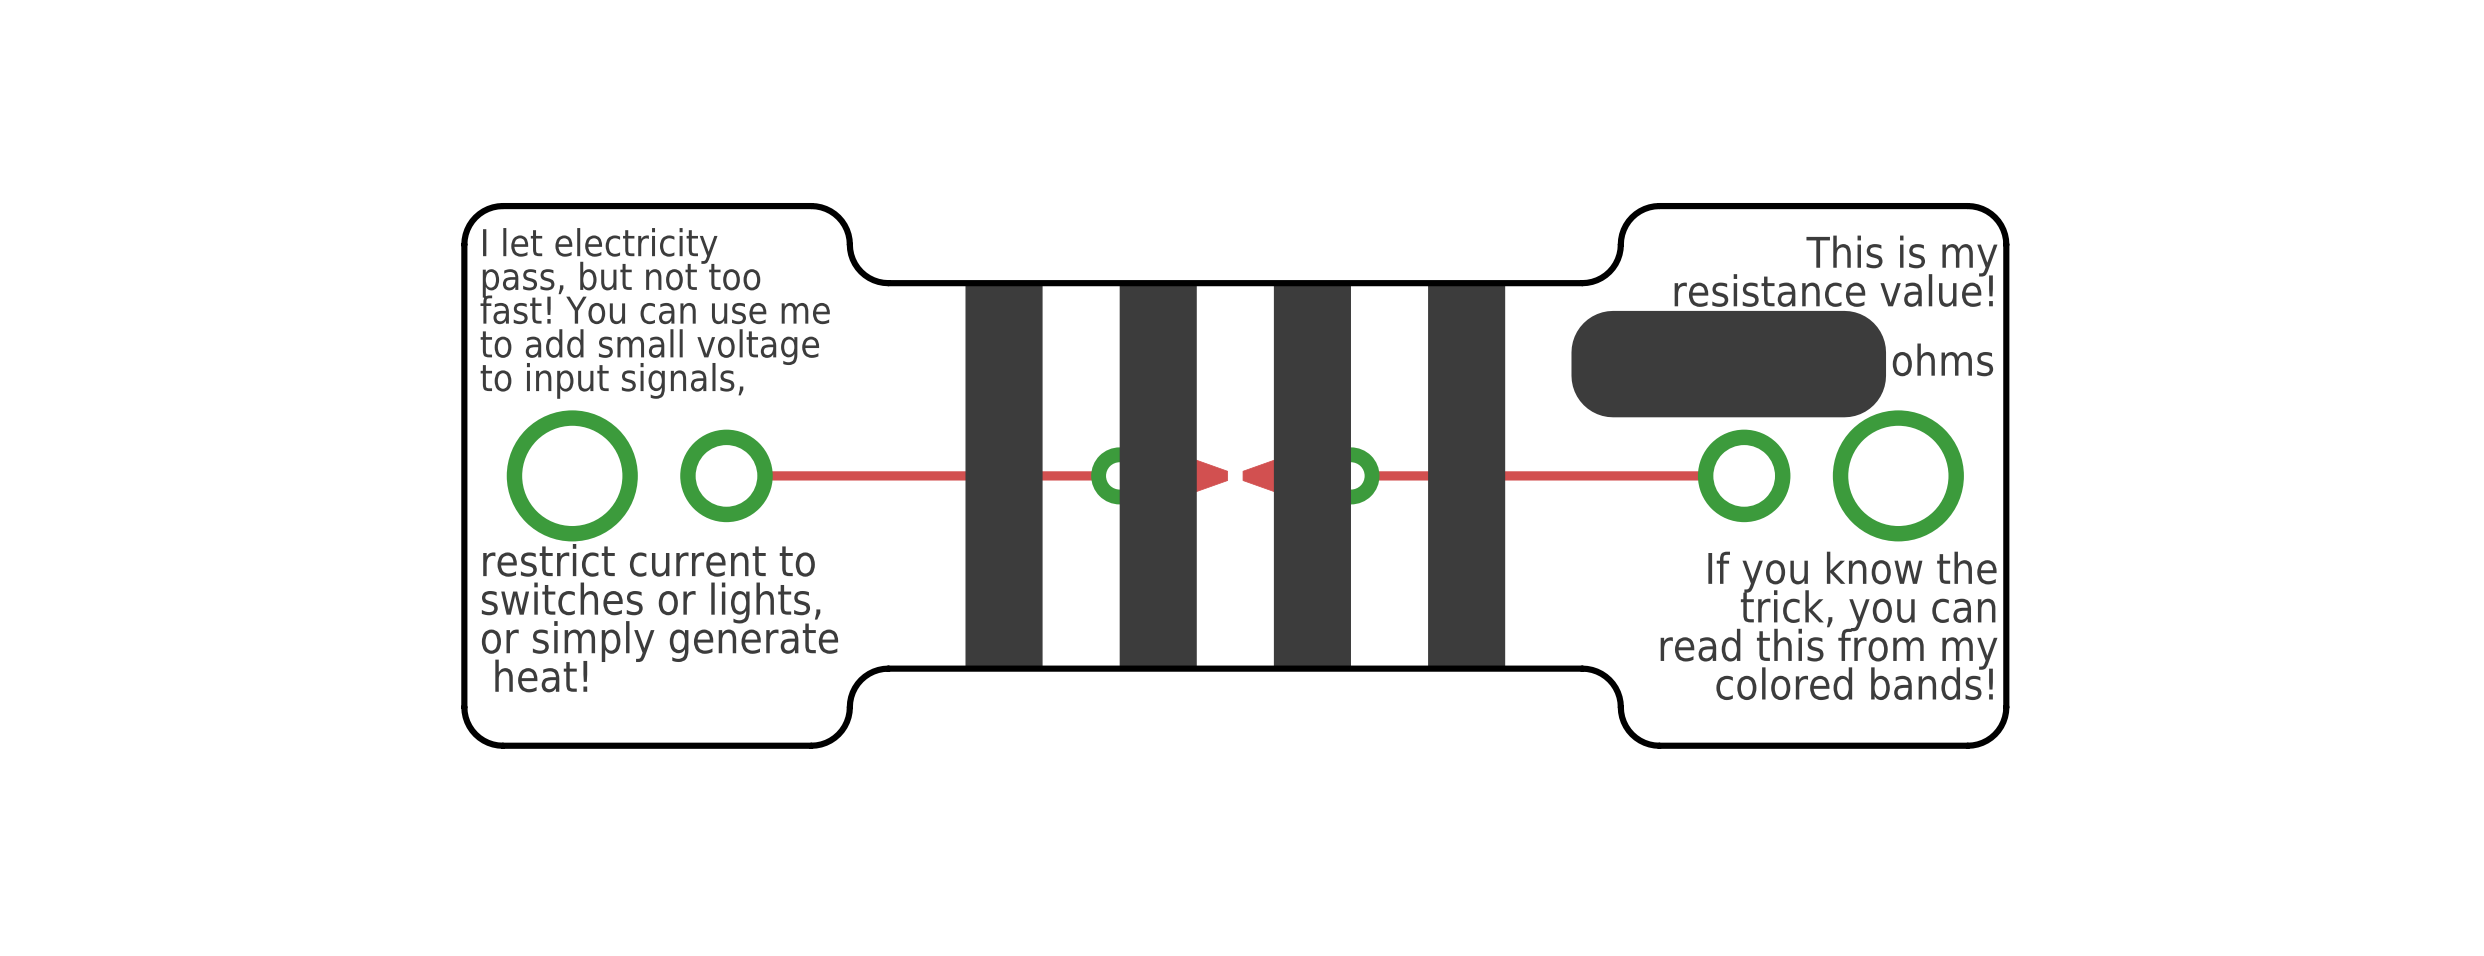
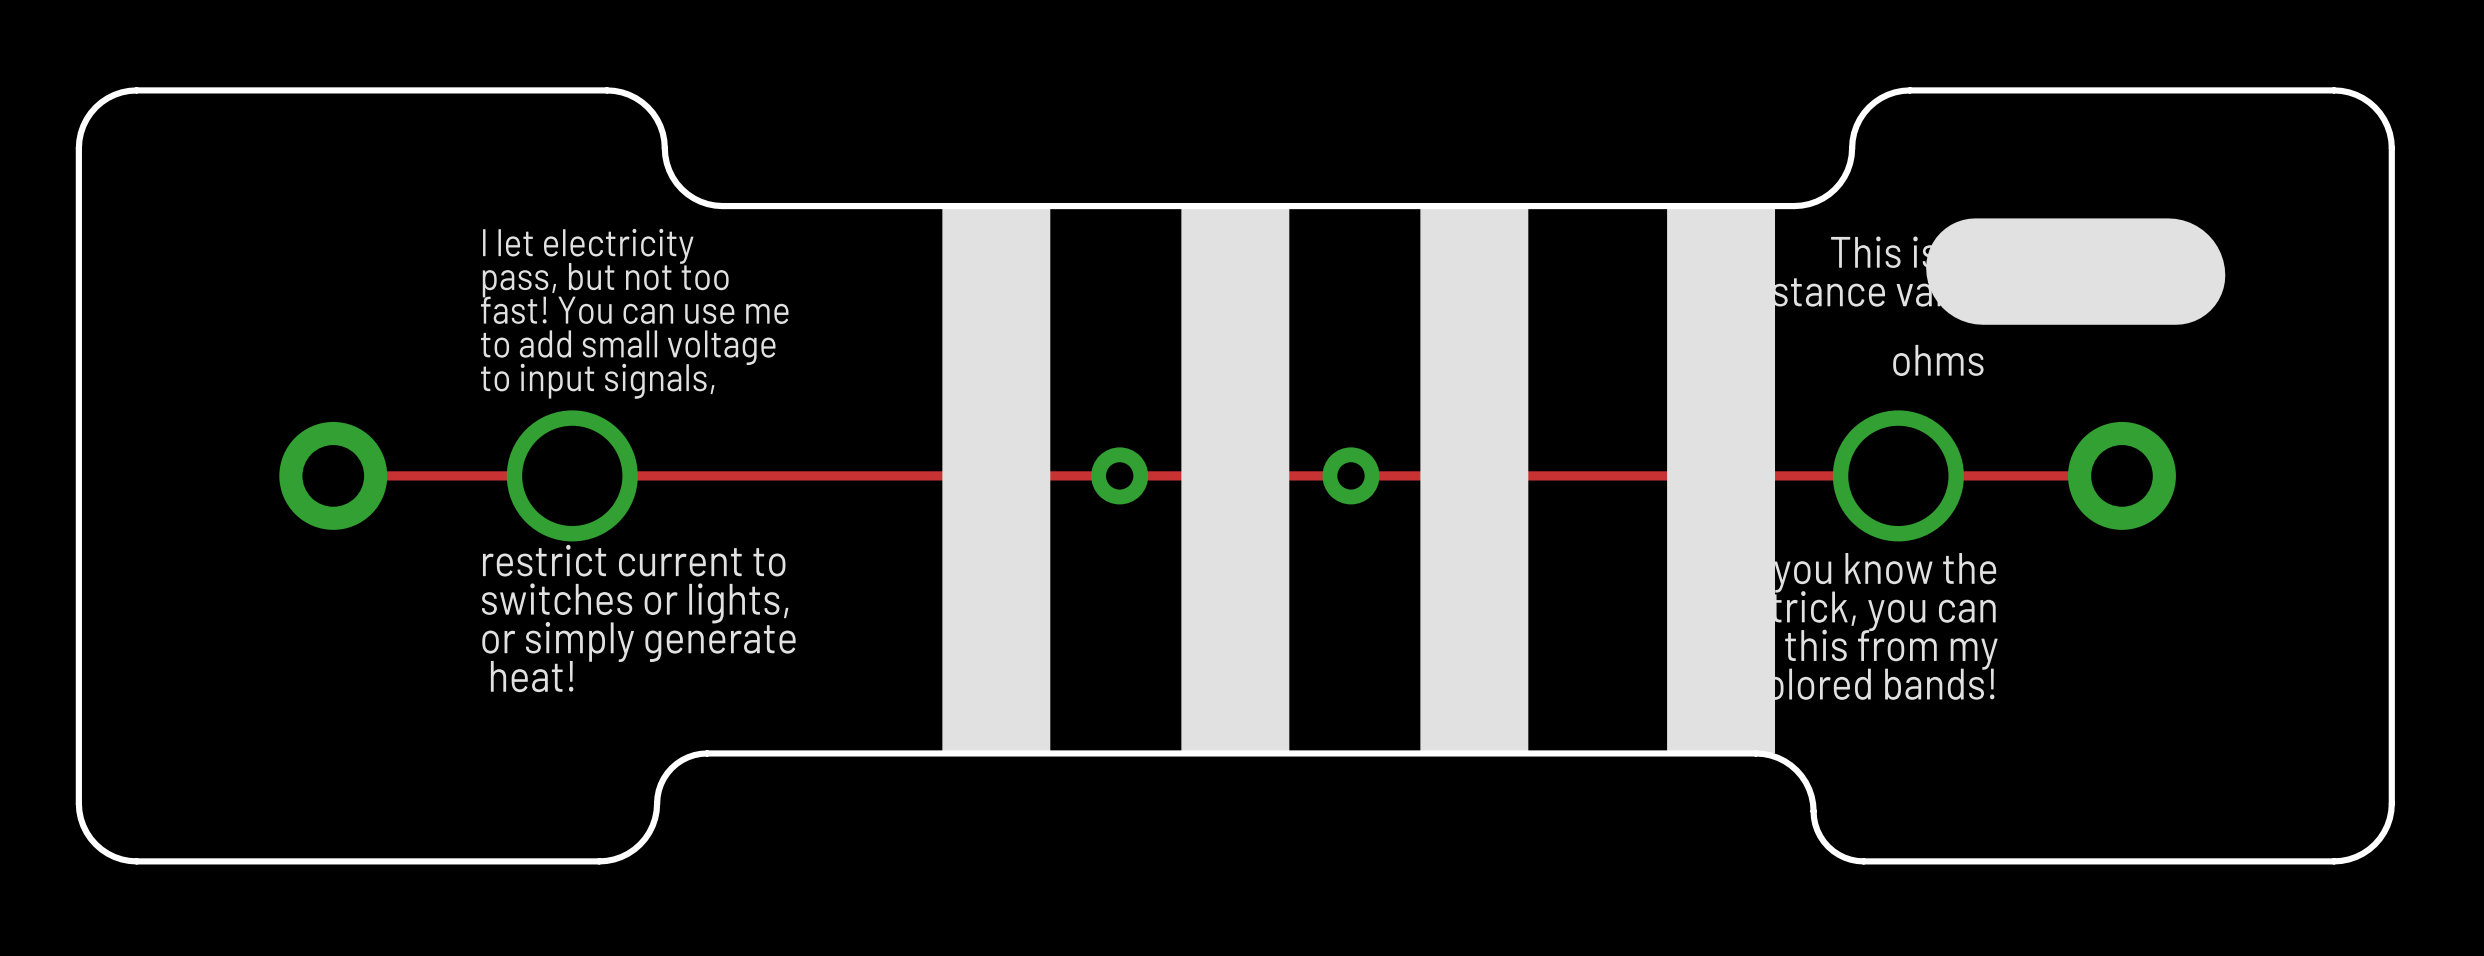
drawing: none -> [1181, 206, 1290, 754]
board edge: (1659, 206) (1640, 211) (1628, 221) (1622, 234) (1617, 259) (1609, 271) (1597, 280) (1582, 283) (883, 282) (869, 277) (857, 268) (851, 254) (846, 229) (838, 217) (826, 208) (811, 206) -> (1659, 206) (811, 206)
drawing: none -> [1667, 206, 1776, 754]
board edge: (1794, 206) (1972, 206) (1991, 214) (2003, 229) (2006, 244) (2006, 707) (2001, 726) (1991, 737) (1982, 742) (1967, 745) (1654, 745) (1640, 740) (1628, 730) (1622, 717) (1617, 692) (1609, 679) (1597, 671) (1582, 668) (883, 668) (869, 673) (857, 683) (851, 697) (848, 717) (841, 730) (830, 740) (816, 745) (502, 745) (488, 742) (479, 737) (469, 726) (464, 707) (464, 244) (467, 229) (479, 214) (497, 206) (722, 206) -> (1794, 206) (1816, 201) (1835, 189) (1847, 170) (1854, 133) (1864, 113) (1881, 98) (1902, 90) (2333, 90) (2356, 94) (2374, 107) (2387, 126) (2391, 148) (2391, 803) (2387, 825) (2374, 844) (2356, 856) (2333, 861) (1857, 860) (1844, 857) (1833, 851) (1820, 836) (1815, 824) (1809, 789) (1796, 770) (1777, 757) (1755, 753) (707, 753) (688, 757) (671, 768) (660, 784) (655, 818) (645, 838) (628, 853) (606, 860) (136, 861) (114, 856) (95, 844) (83, 825) (78, 803) (78, 148) (83, 126) (95, 107) (114, 94) (136, 90) (614, 90) (635, 98) (652, 113) (662, 133) (669, 170) (681, 189) (700, 201) (722, 206)
drawing: none -> [1926, 218, 2226, 325]
drawing shape: [965, 283, 1043, 669] -> [942, 206, 1051, 754]
drawing: [1119, 283, 1197, 669] -> none
drawing: [1273, 283, 1351, 669] -> none
drawing shape: [1428, 283, 1506, 669] -> [1420, 206, 1529, 754]
drawing: [1571, 310, 1887, 418] -> none
via: none -> (333, 475)
top track: none -> (726, 475) (333, 475)
via: (726, 475) -> none
via: (1744, 475) -> none
top track: none -> (2121, 475) (1744, 475)
via: none -> (2121, 475)

